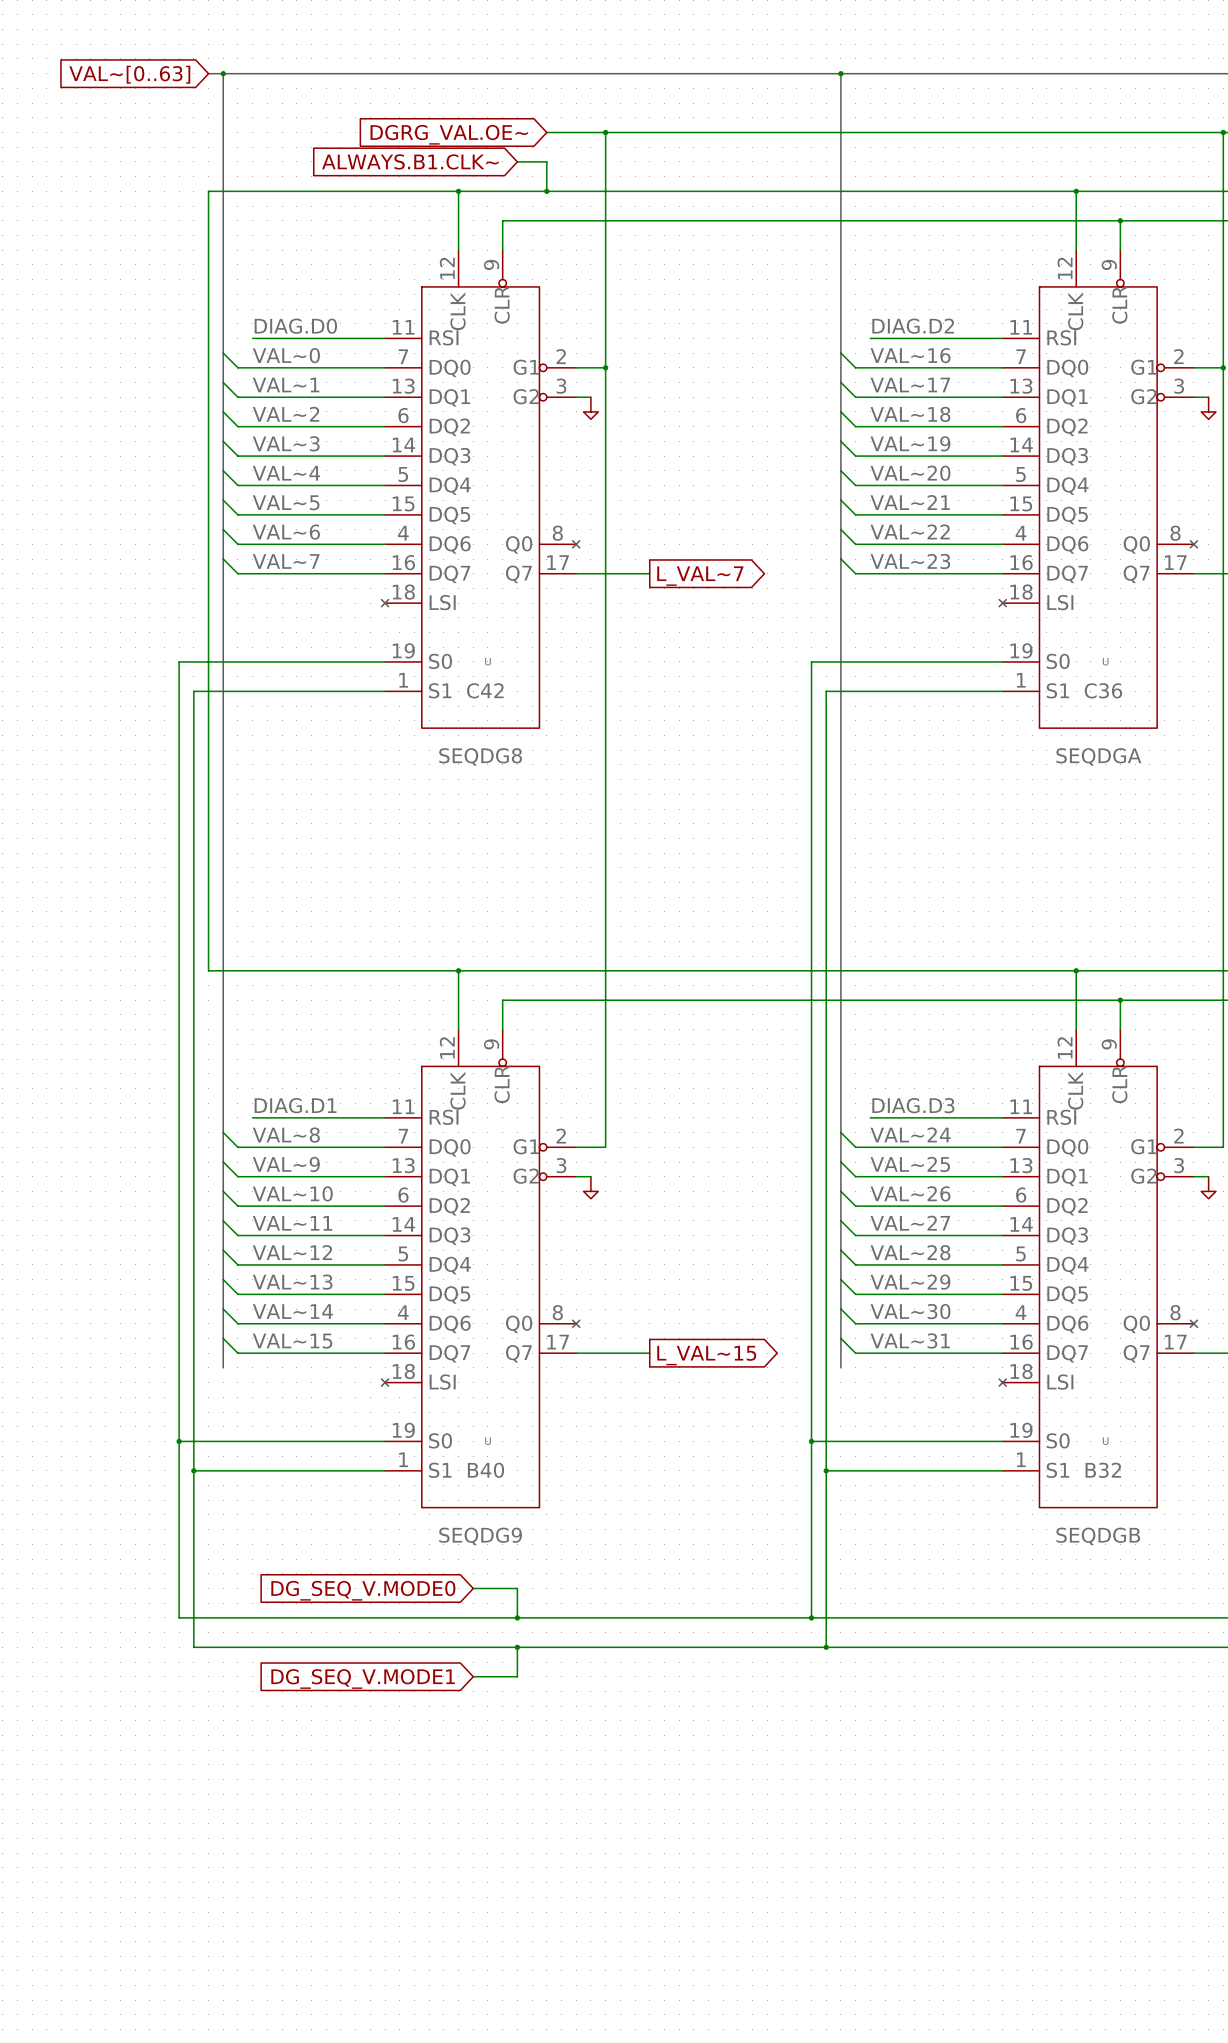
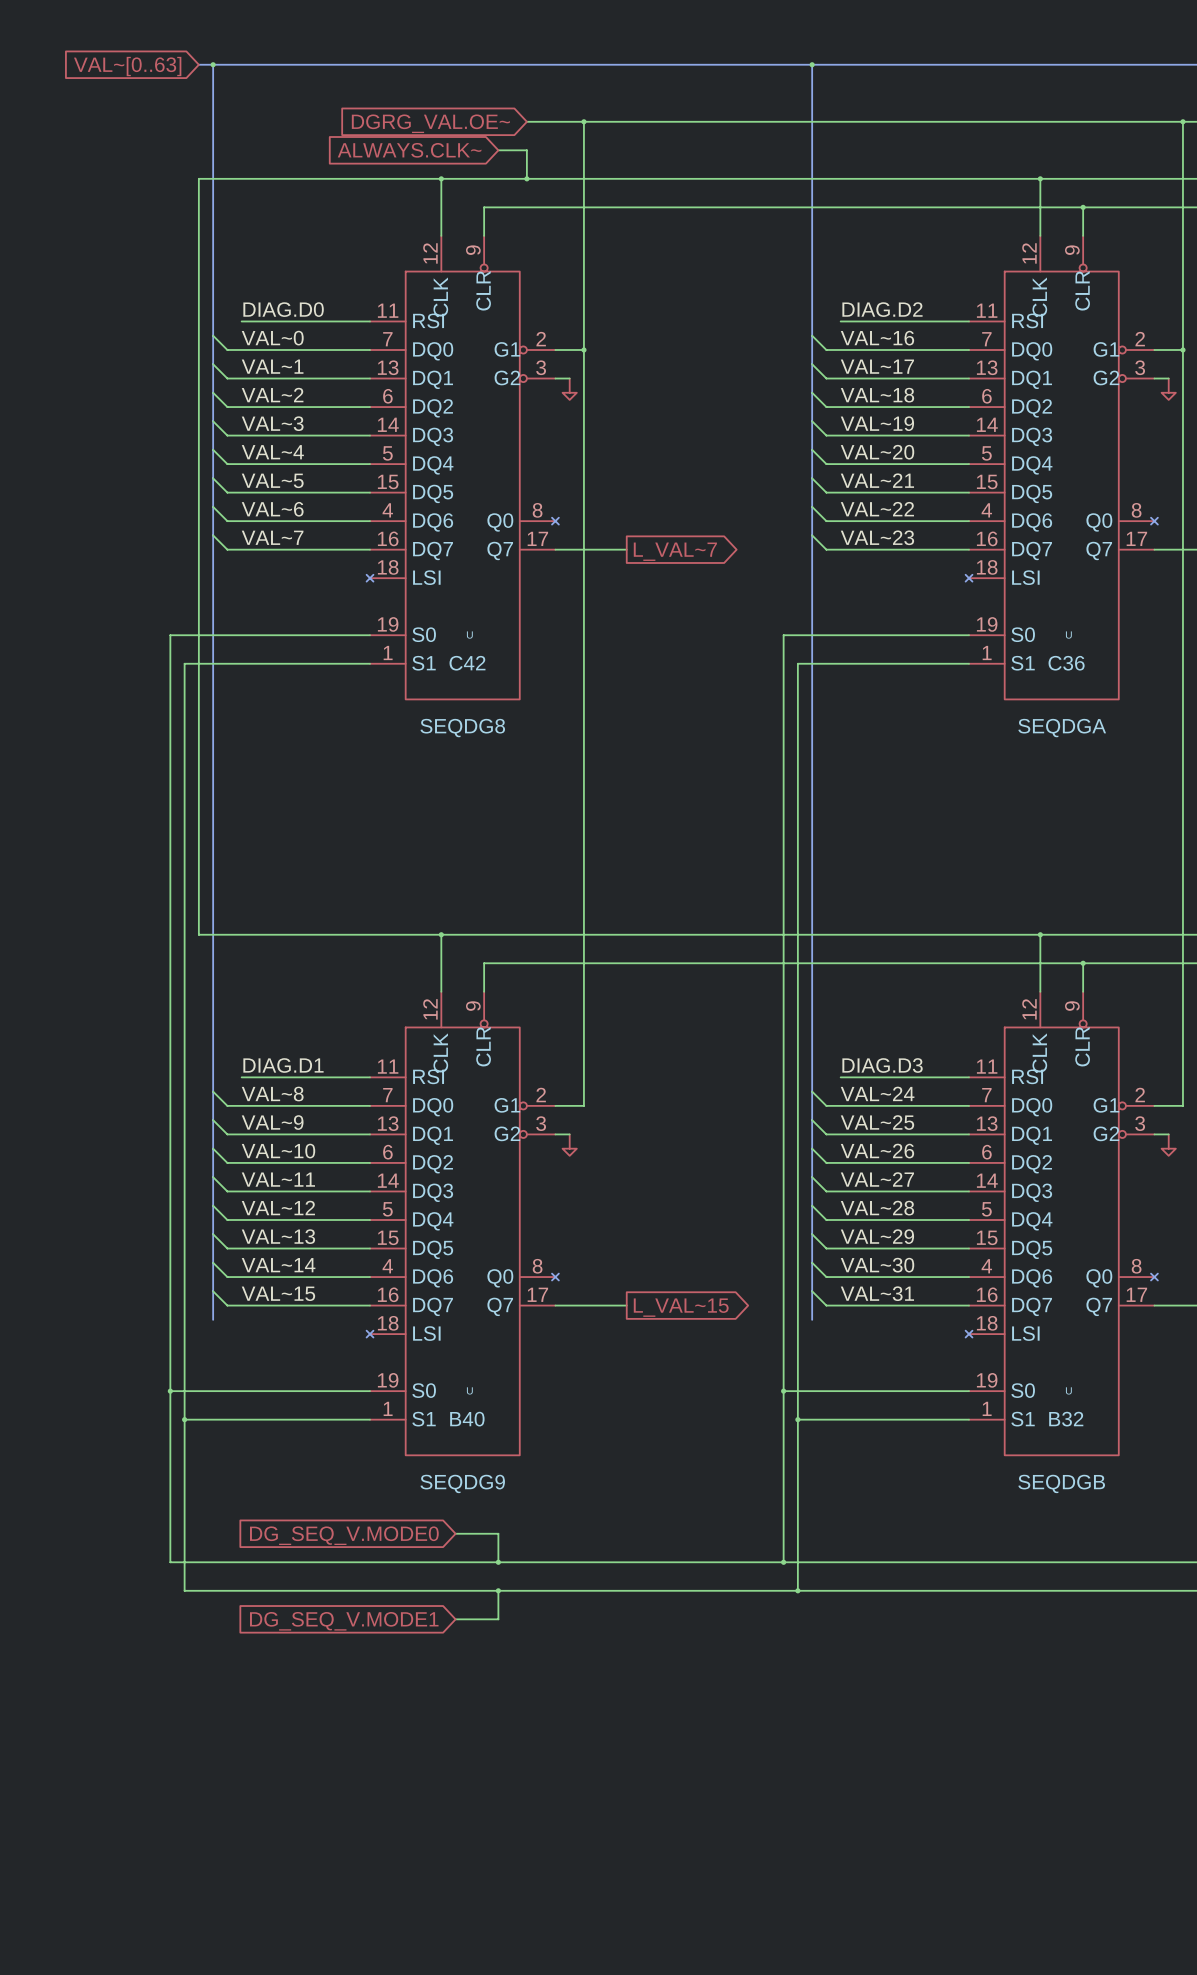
global label: ALWAYS.B1.CLK~ (410, 161) -> ALWAYS.CLK~ (409, 150)

